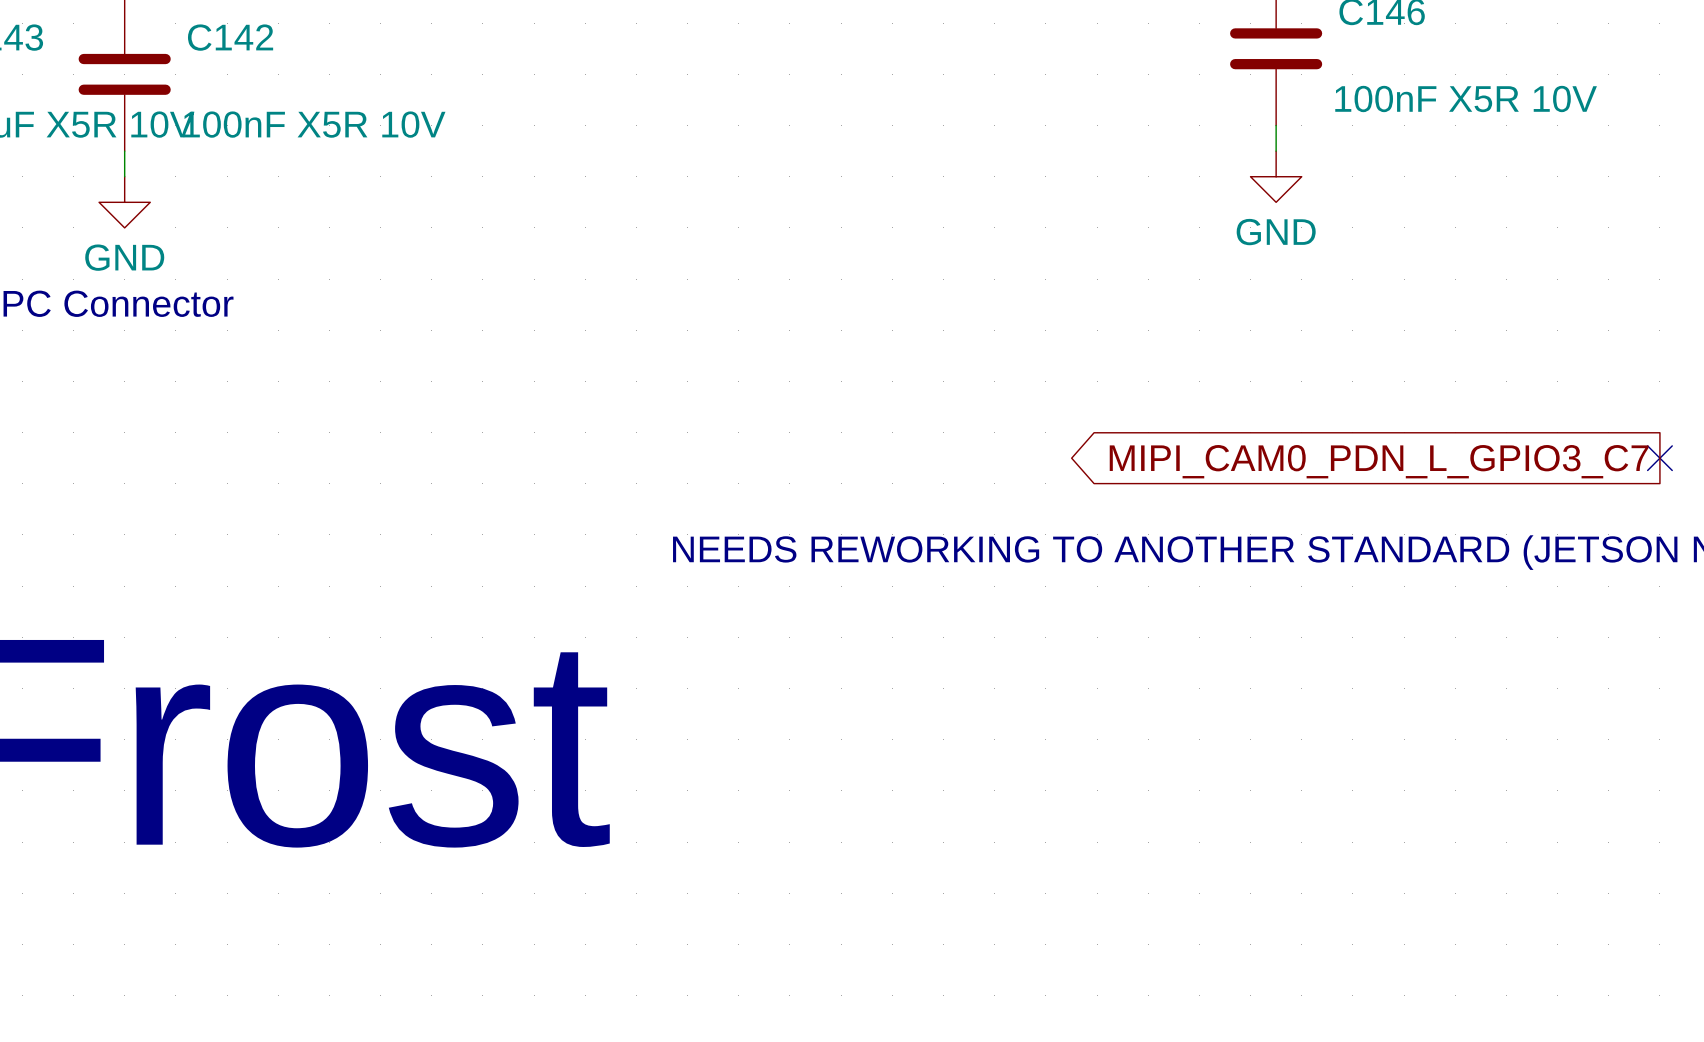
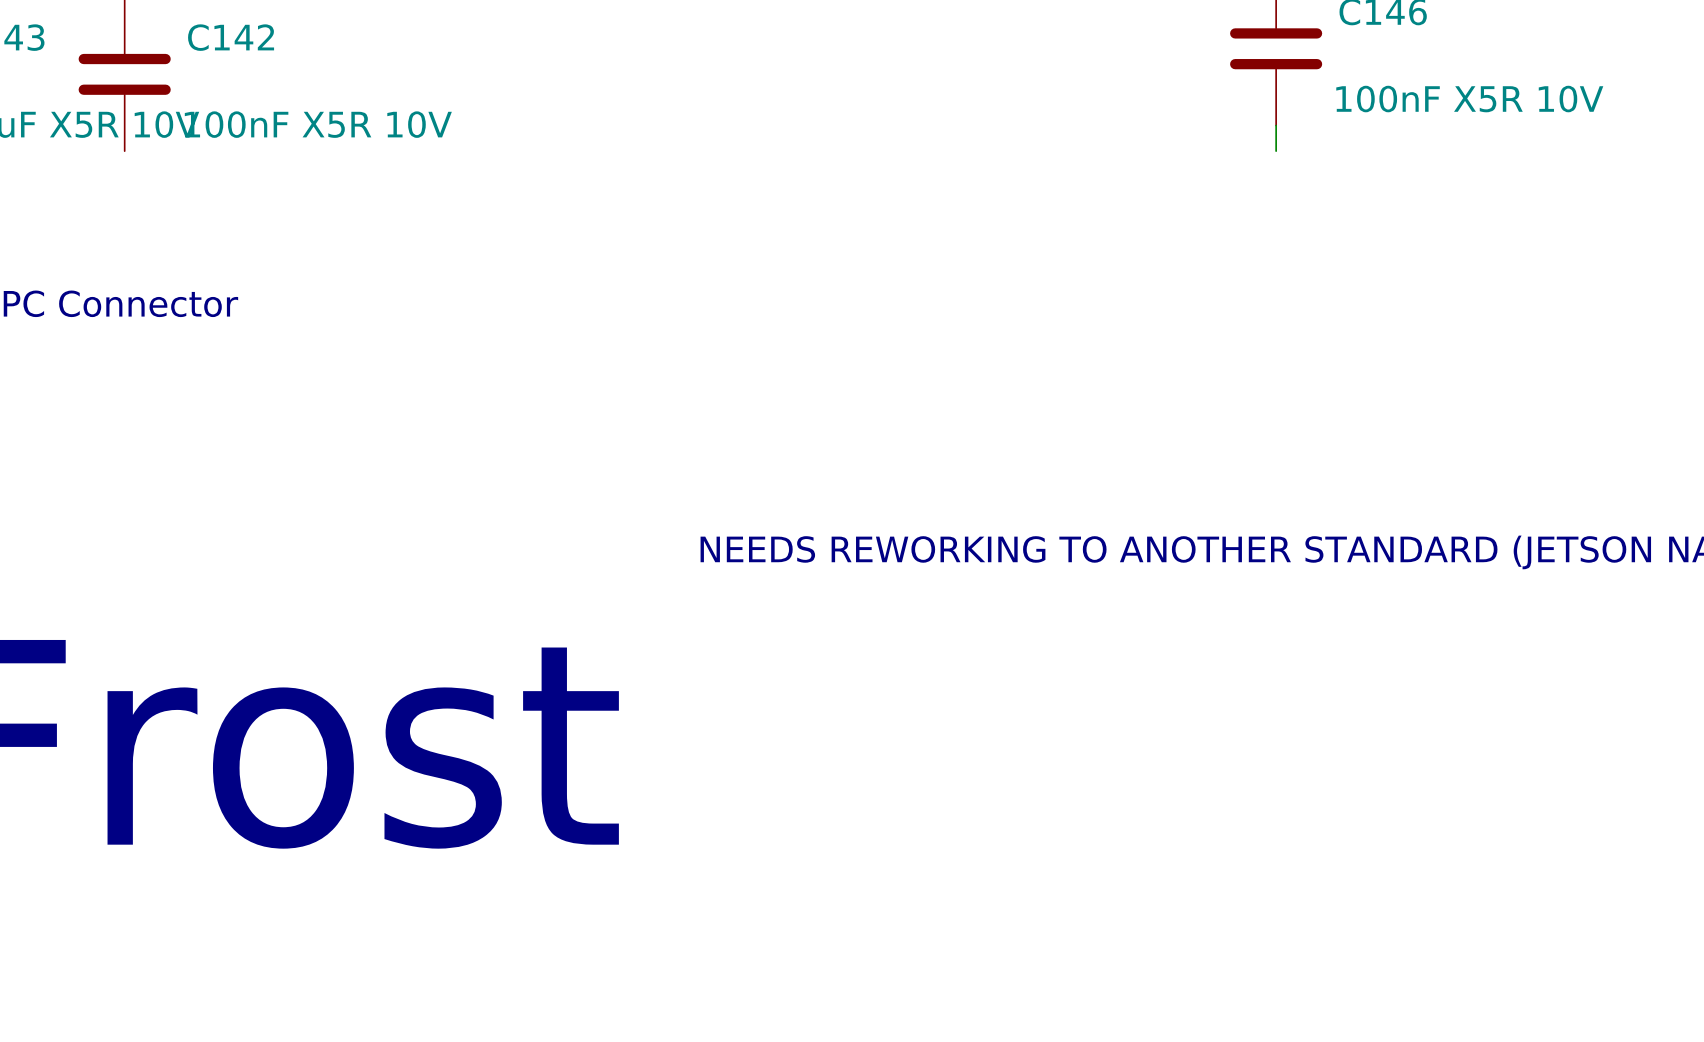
wire: (124, 151) (124, 176) -> none
power symbol: GND (1276, 176) -> none
power symbol: GND (124, 202) -> none
no-connect mark: (1659, 458) -> none
global label: MIPI_CAM0_PDN_L_GPIO3_C7 (1379, 461) -> none

